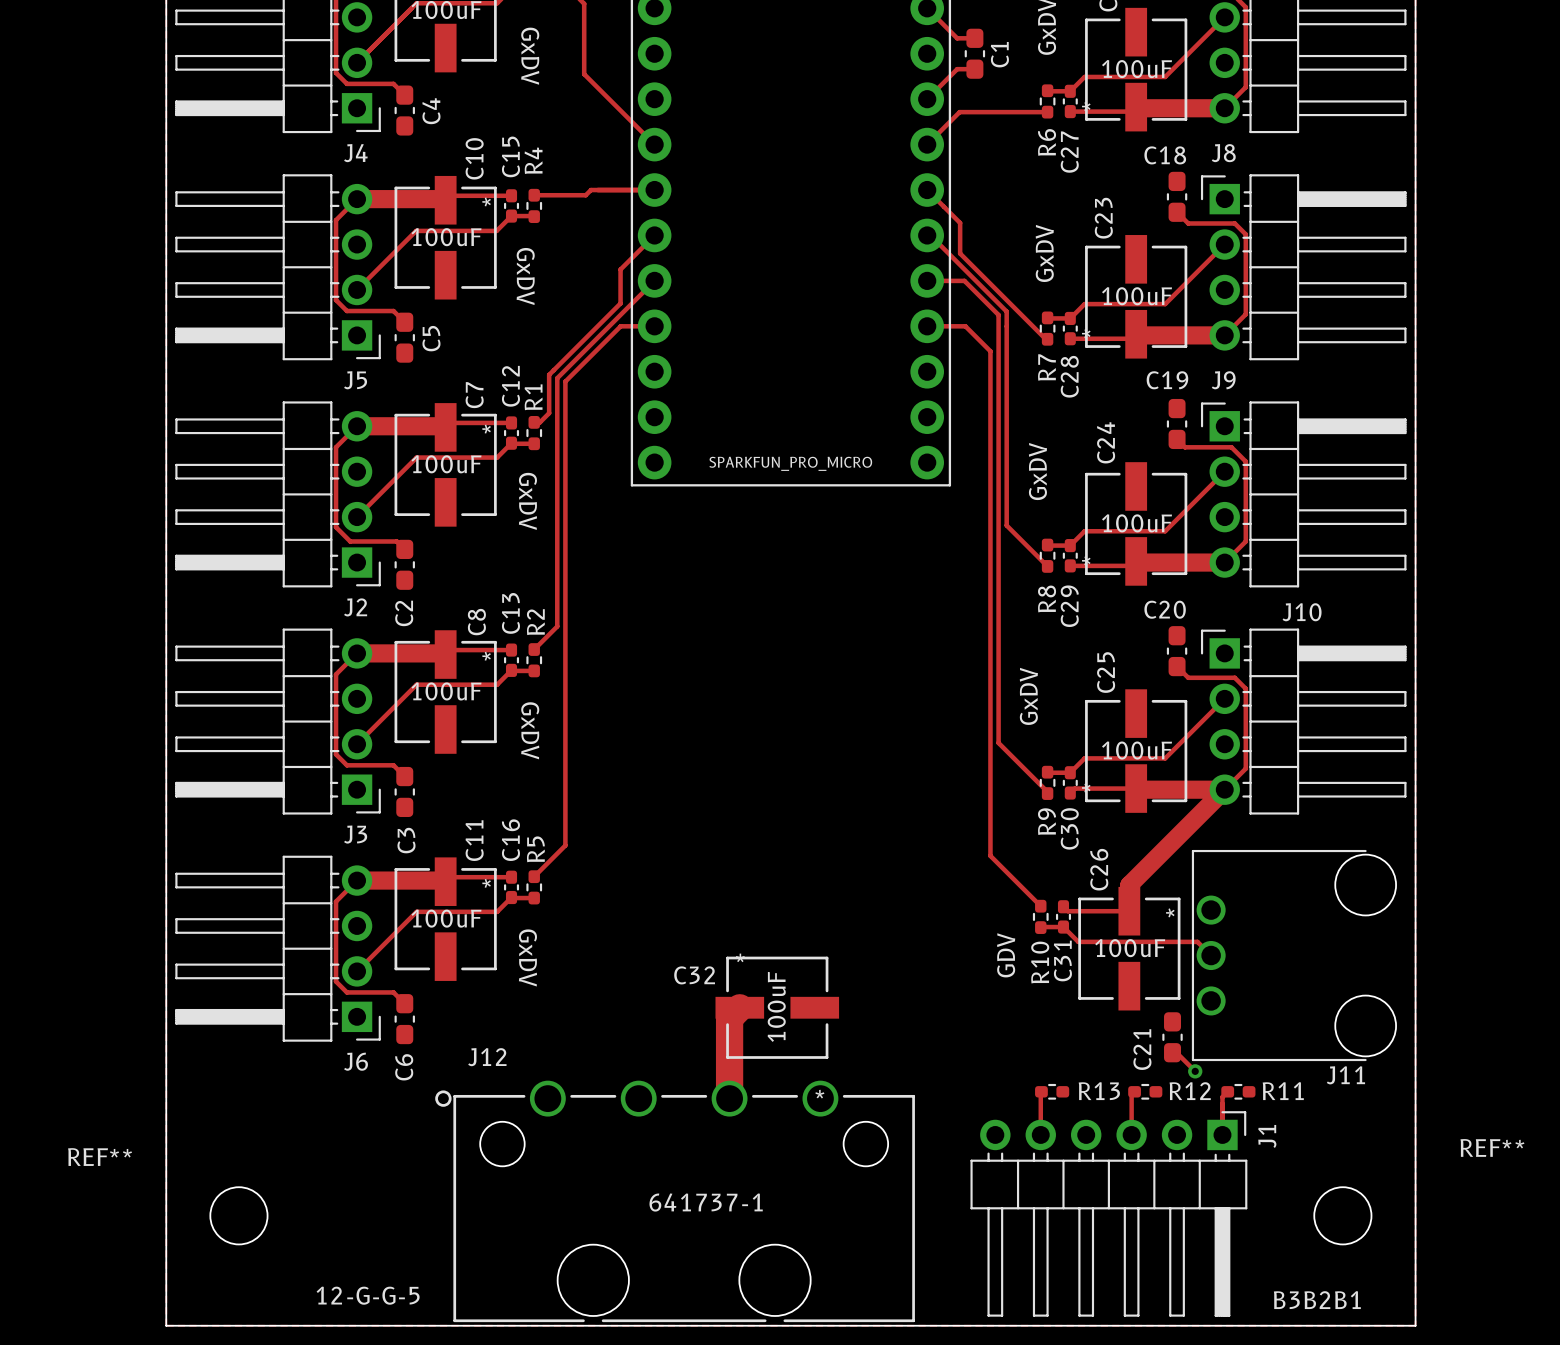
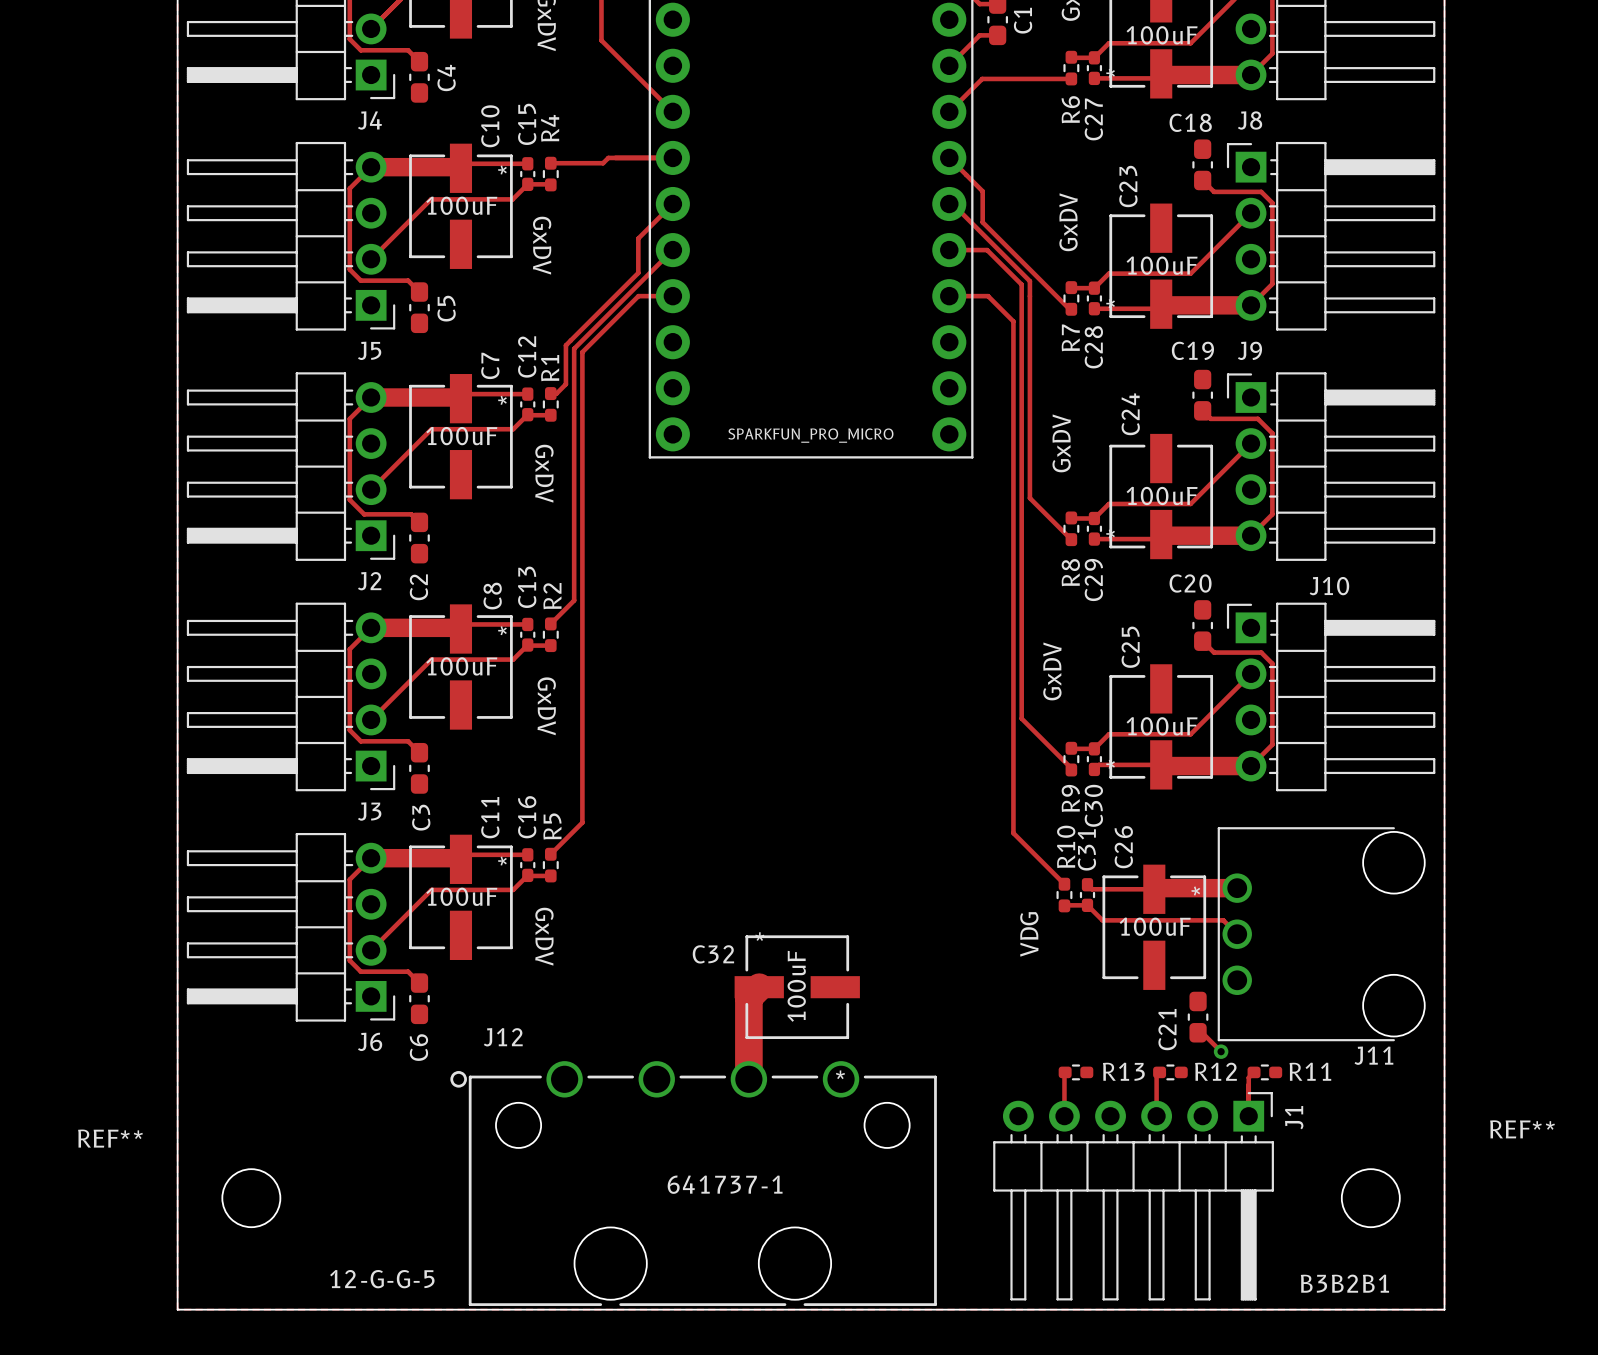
track: (1224, 789) (1129, 885) (1129, 911) -> none
track: none -> (1155, 888) (1237, 888)
text: GDV (1006, 955) -> VDG (1029, 934)
C31 name position: C31 (1062, 961) -> C31 (1086, 849)
R10 name position: R10 (1040, 962) -> R10 (1066, 846)

